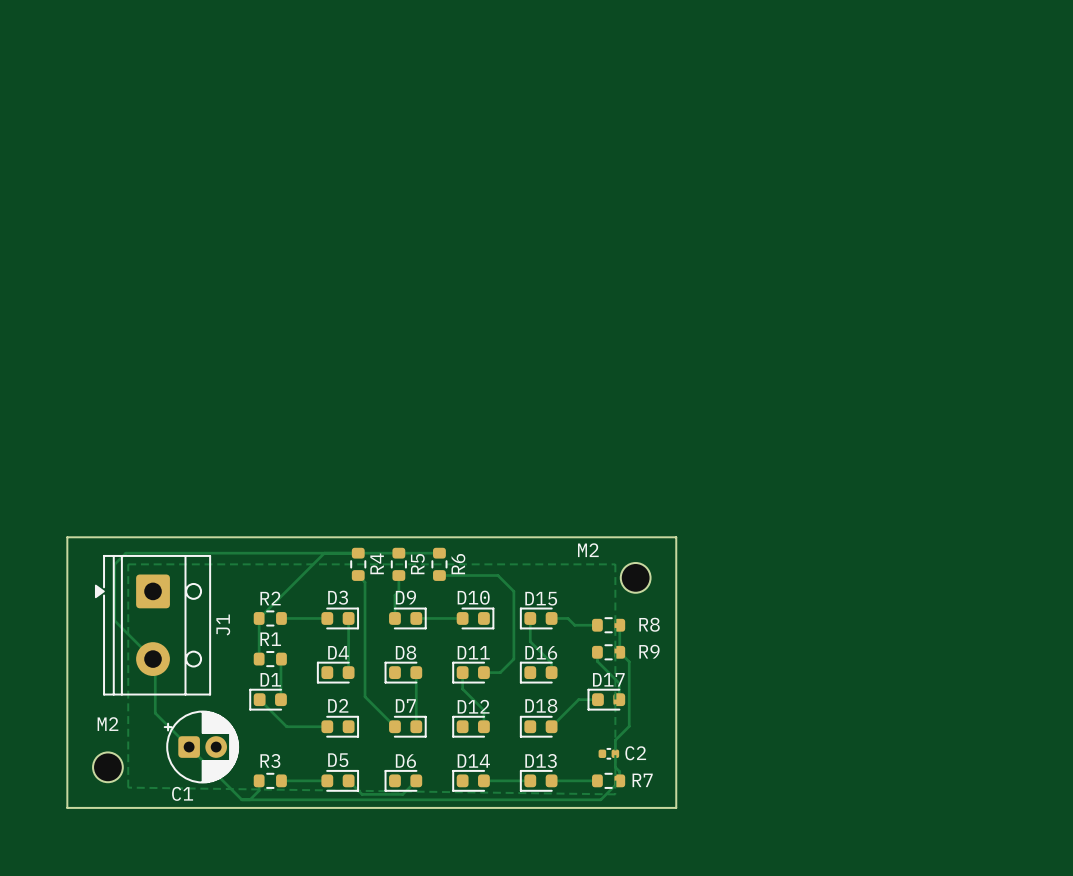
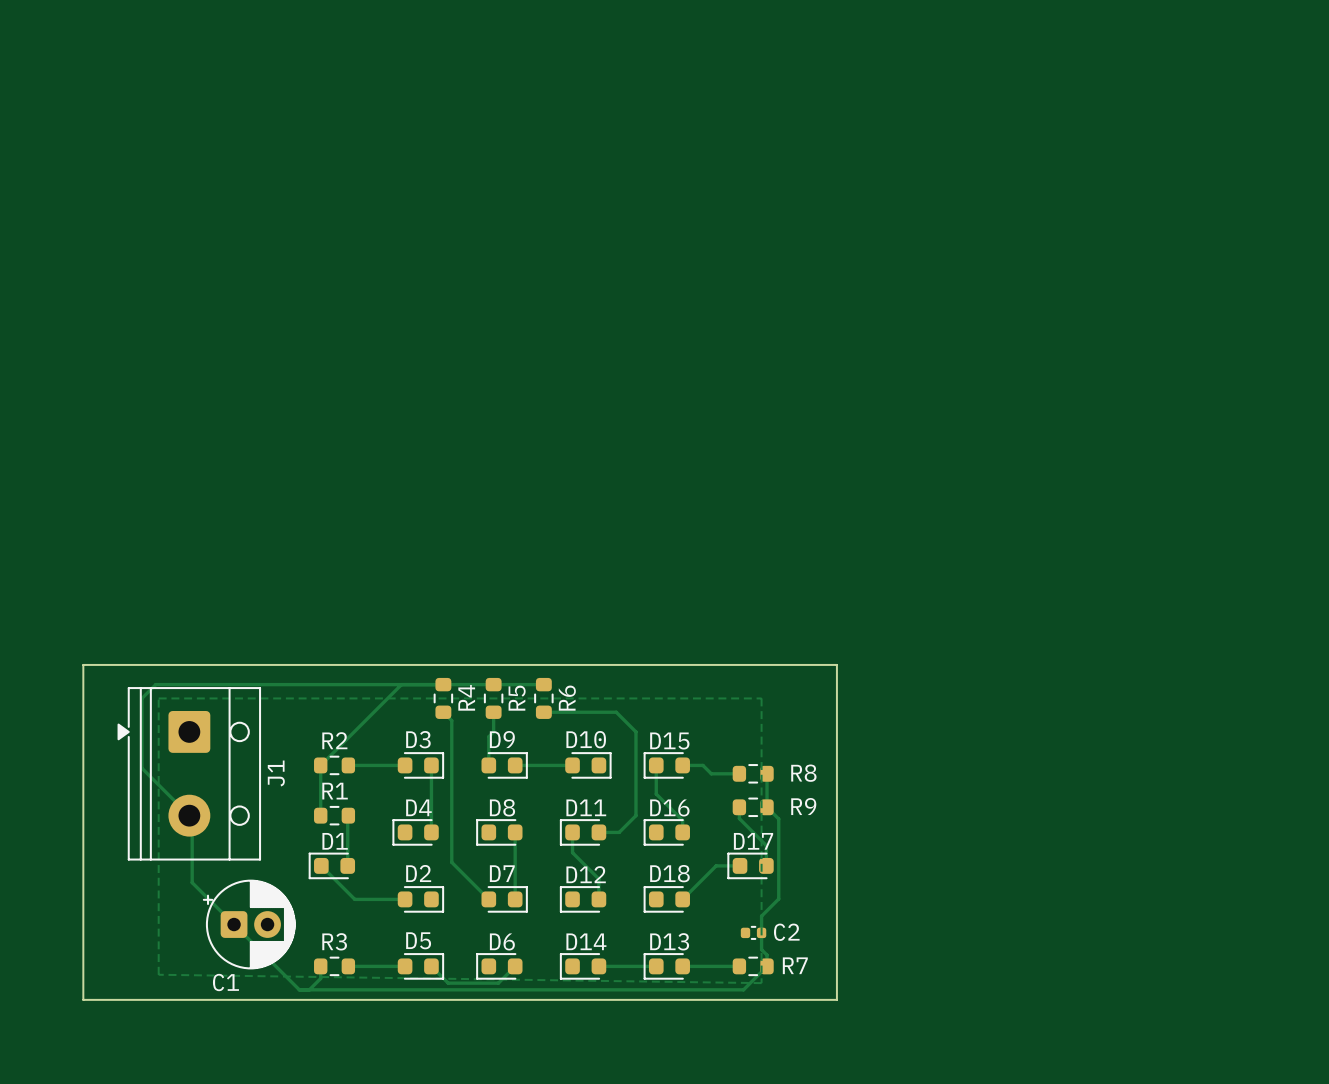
M2: (635, 577) -> none
M2: (107, 767) -> none

